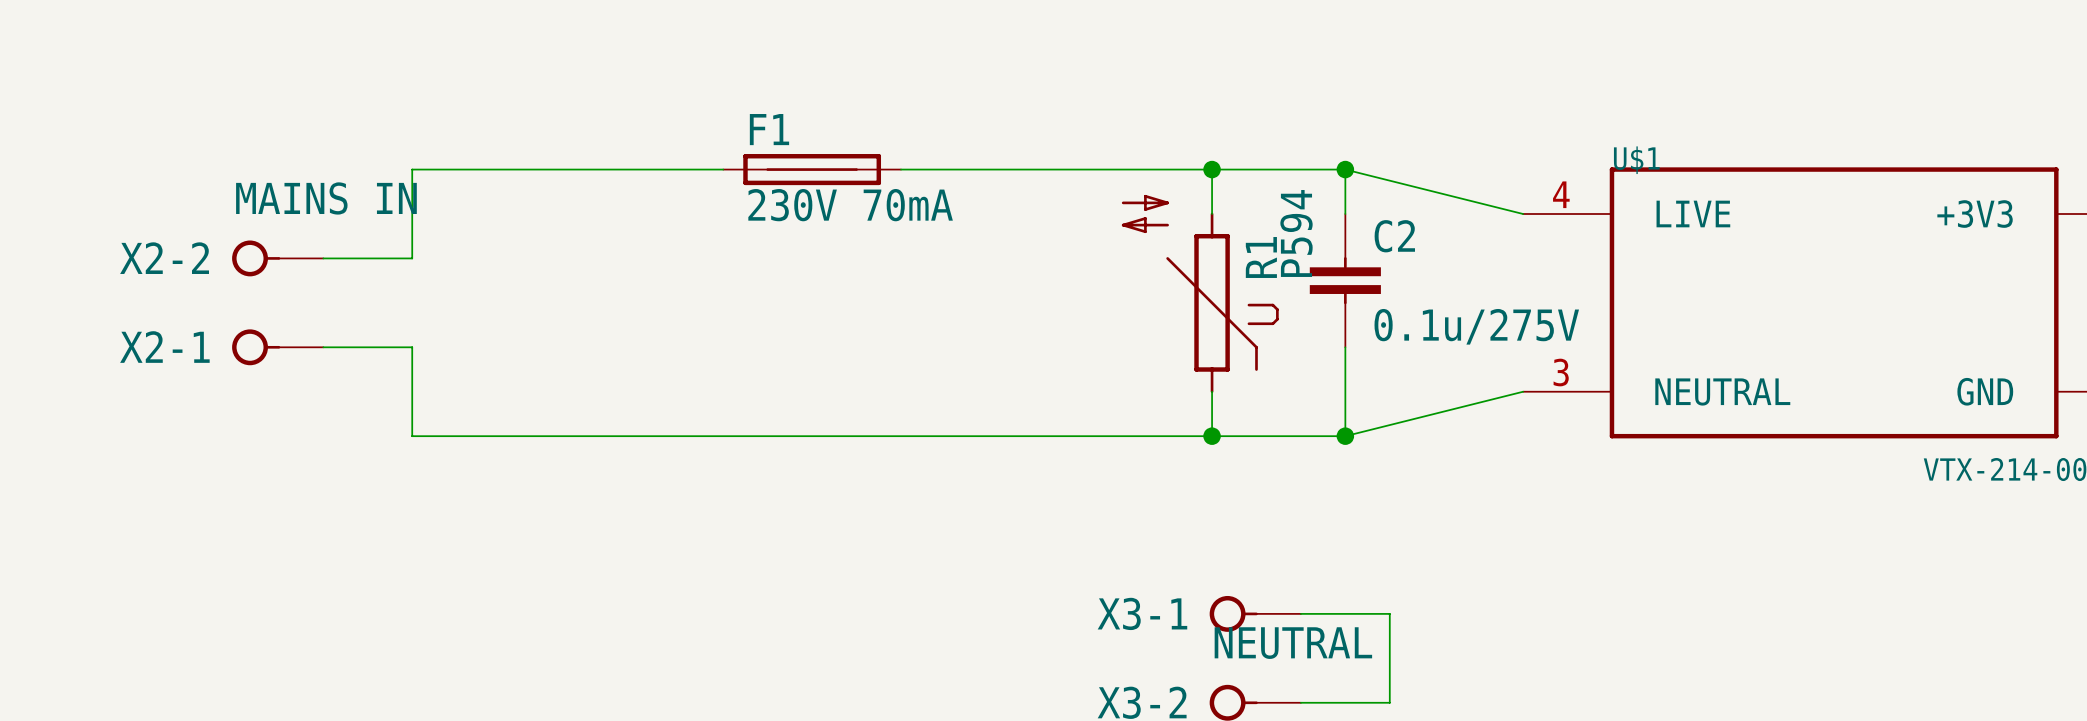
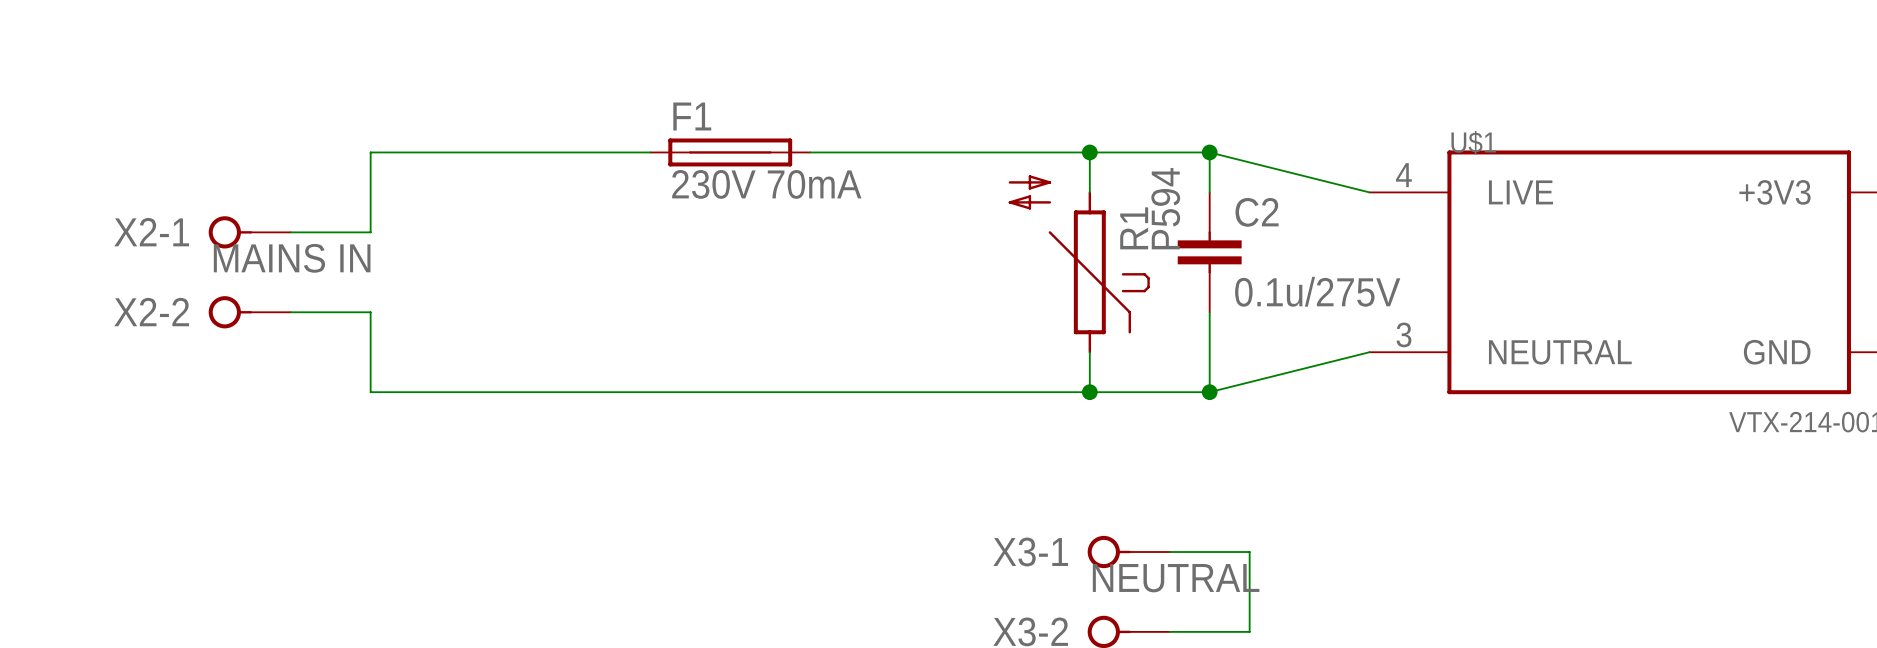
X2-2 value: MAINS IN (326, 198) -> none
X2-2 name: X2-2 (164, 258) -> X2-1 (151, 232)
X2-1 value: none -> MAINS IN (292, 258)
X2-1 name: X2-1 (164, 347) -> X2-2 (151, 312)

